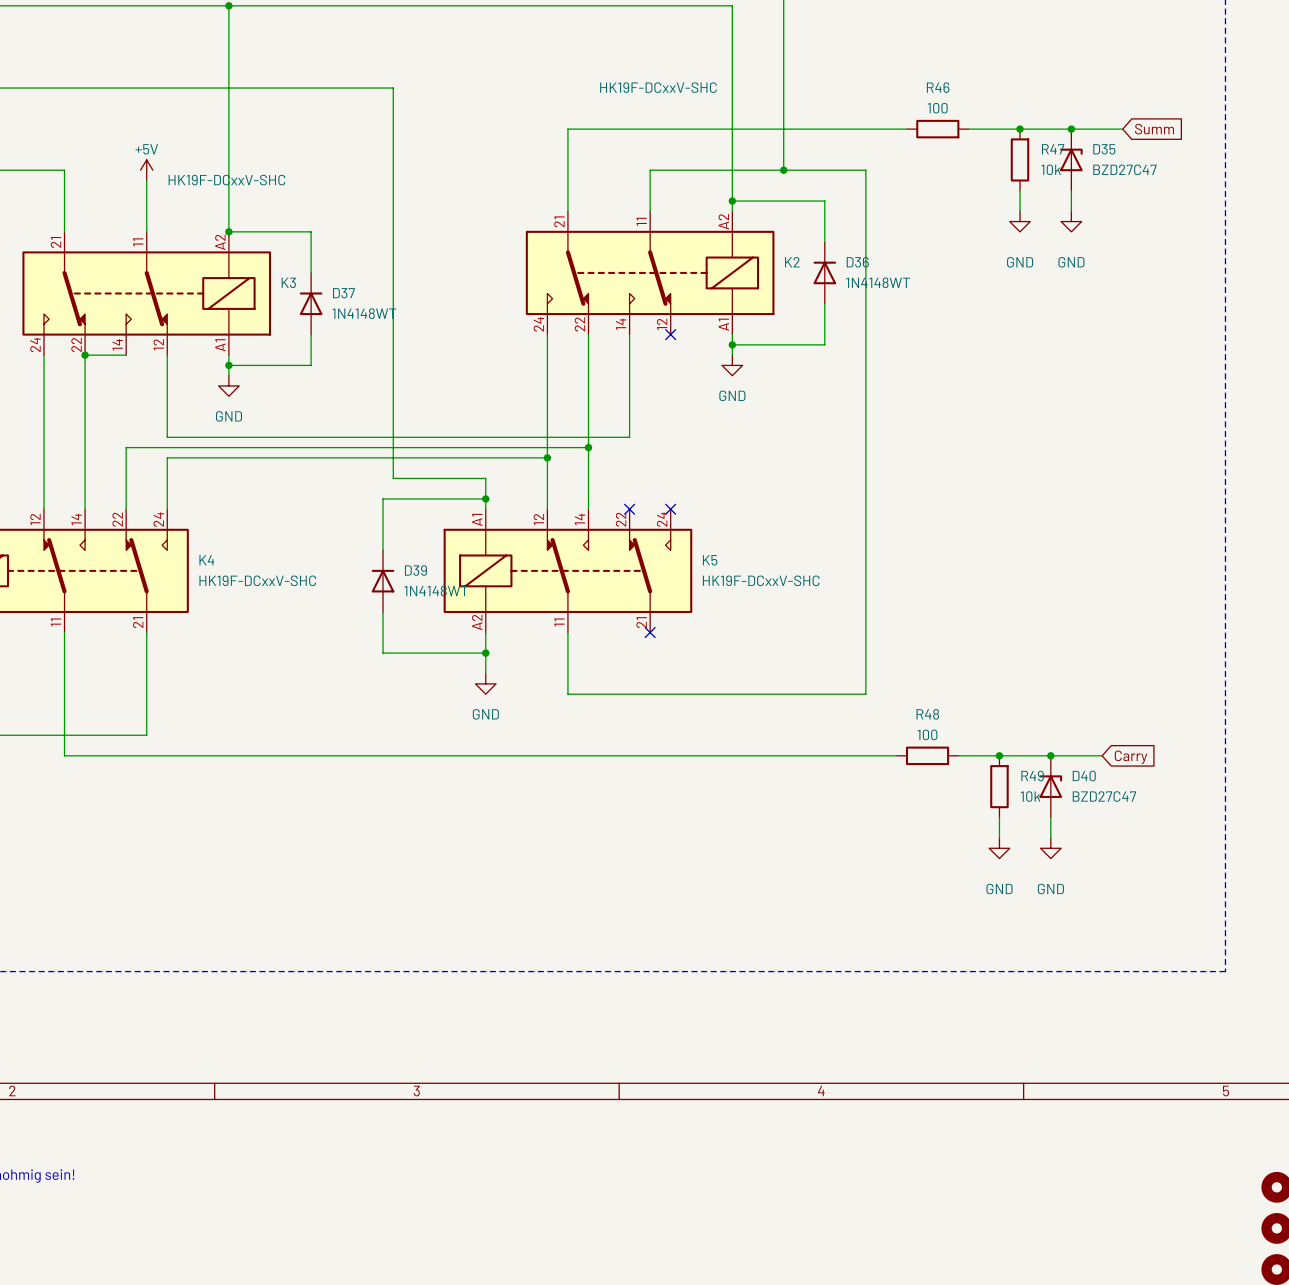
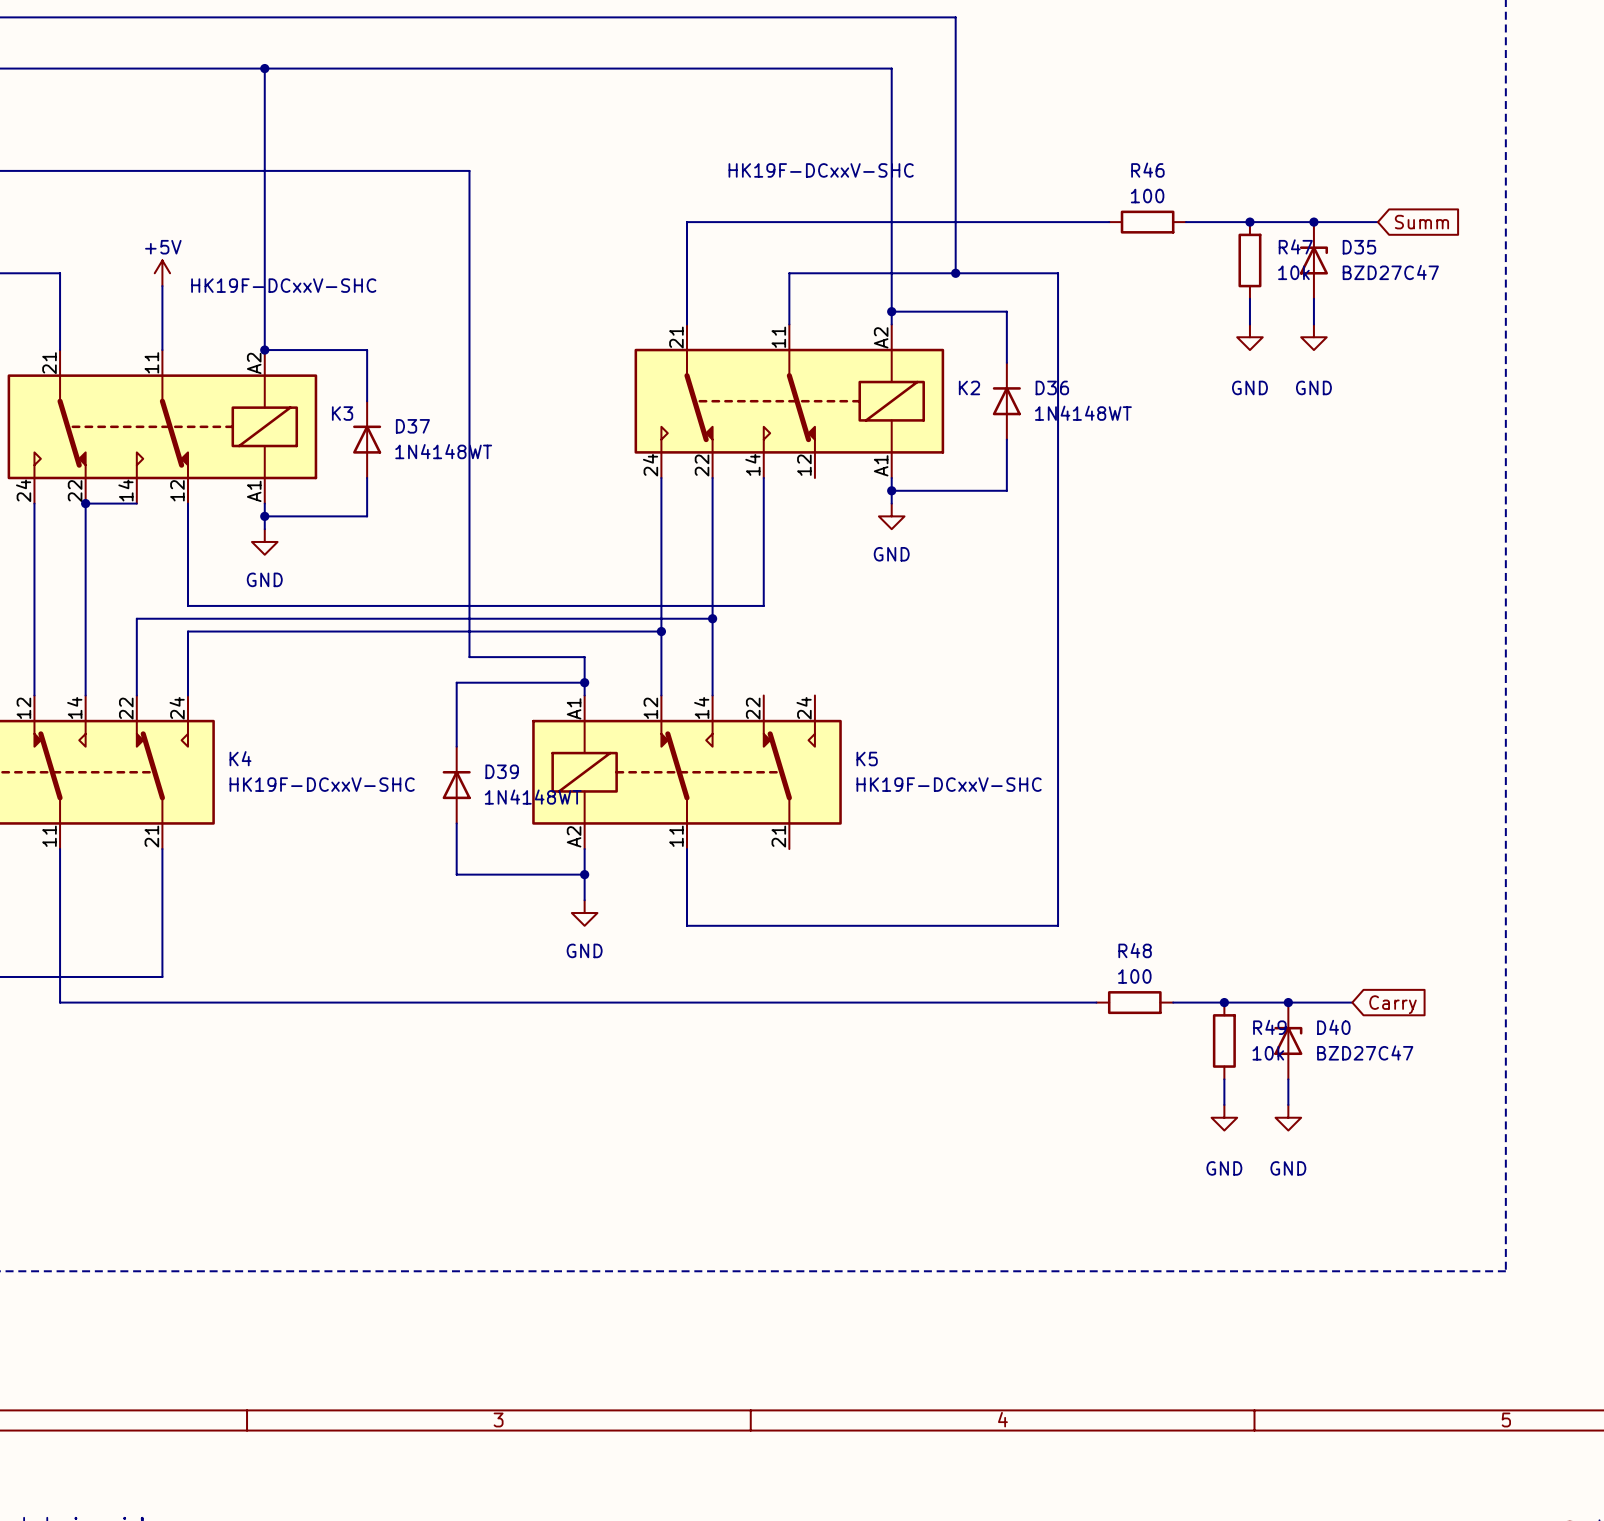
no-connect mark: (670, 334) -> none
no-connect mark: (629, 509) -> none
no-connect mark: (670, 509) -> none
no-connect mark: (650, 632) -> none

